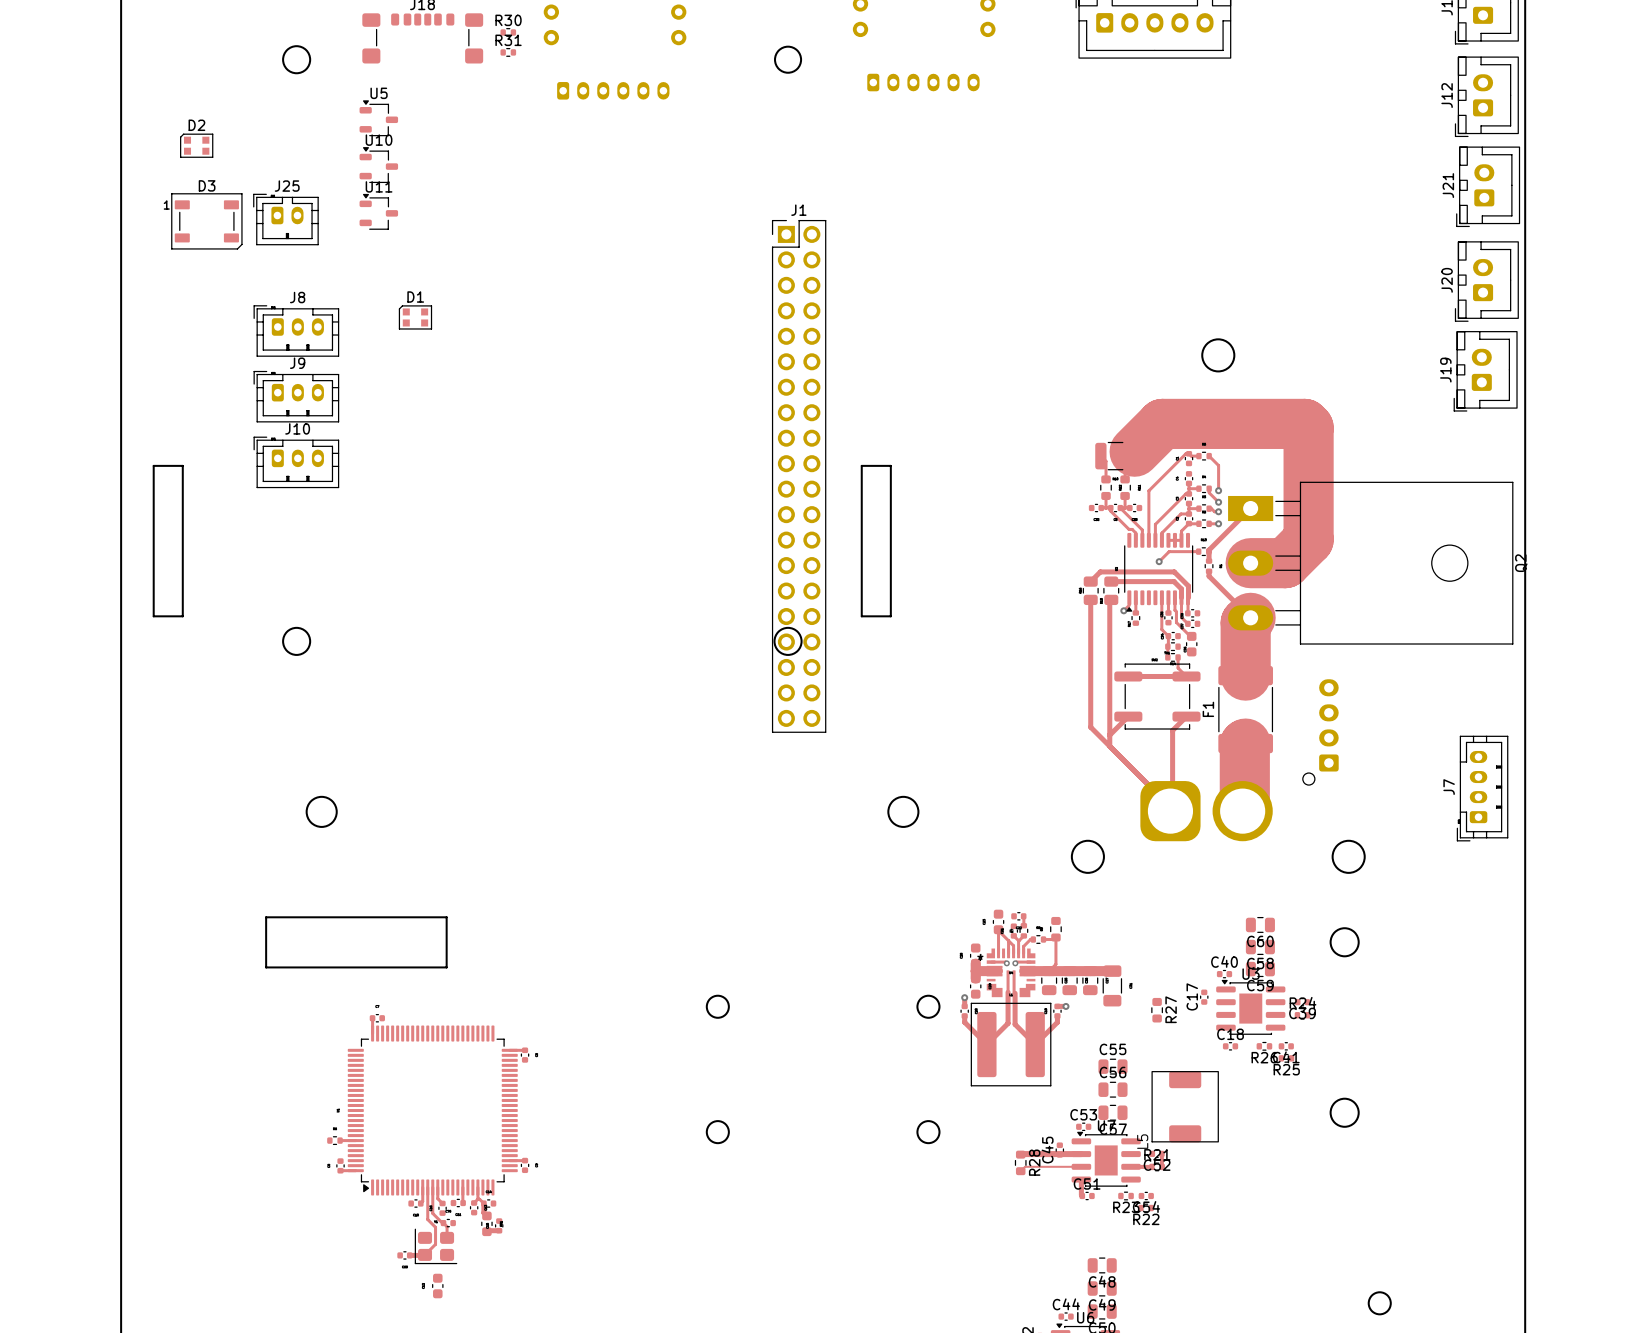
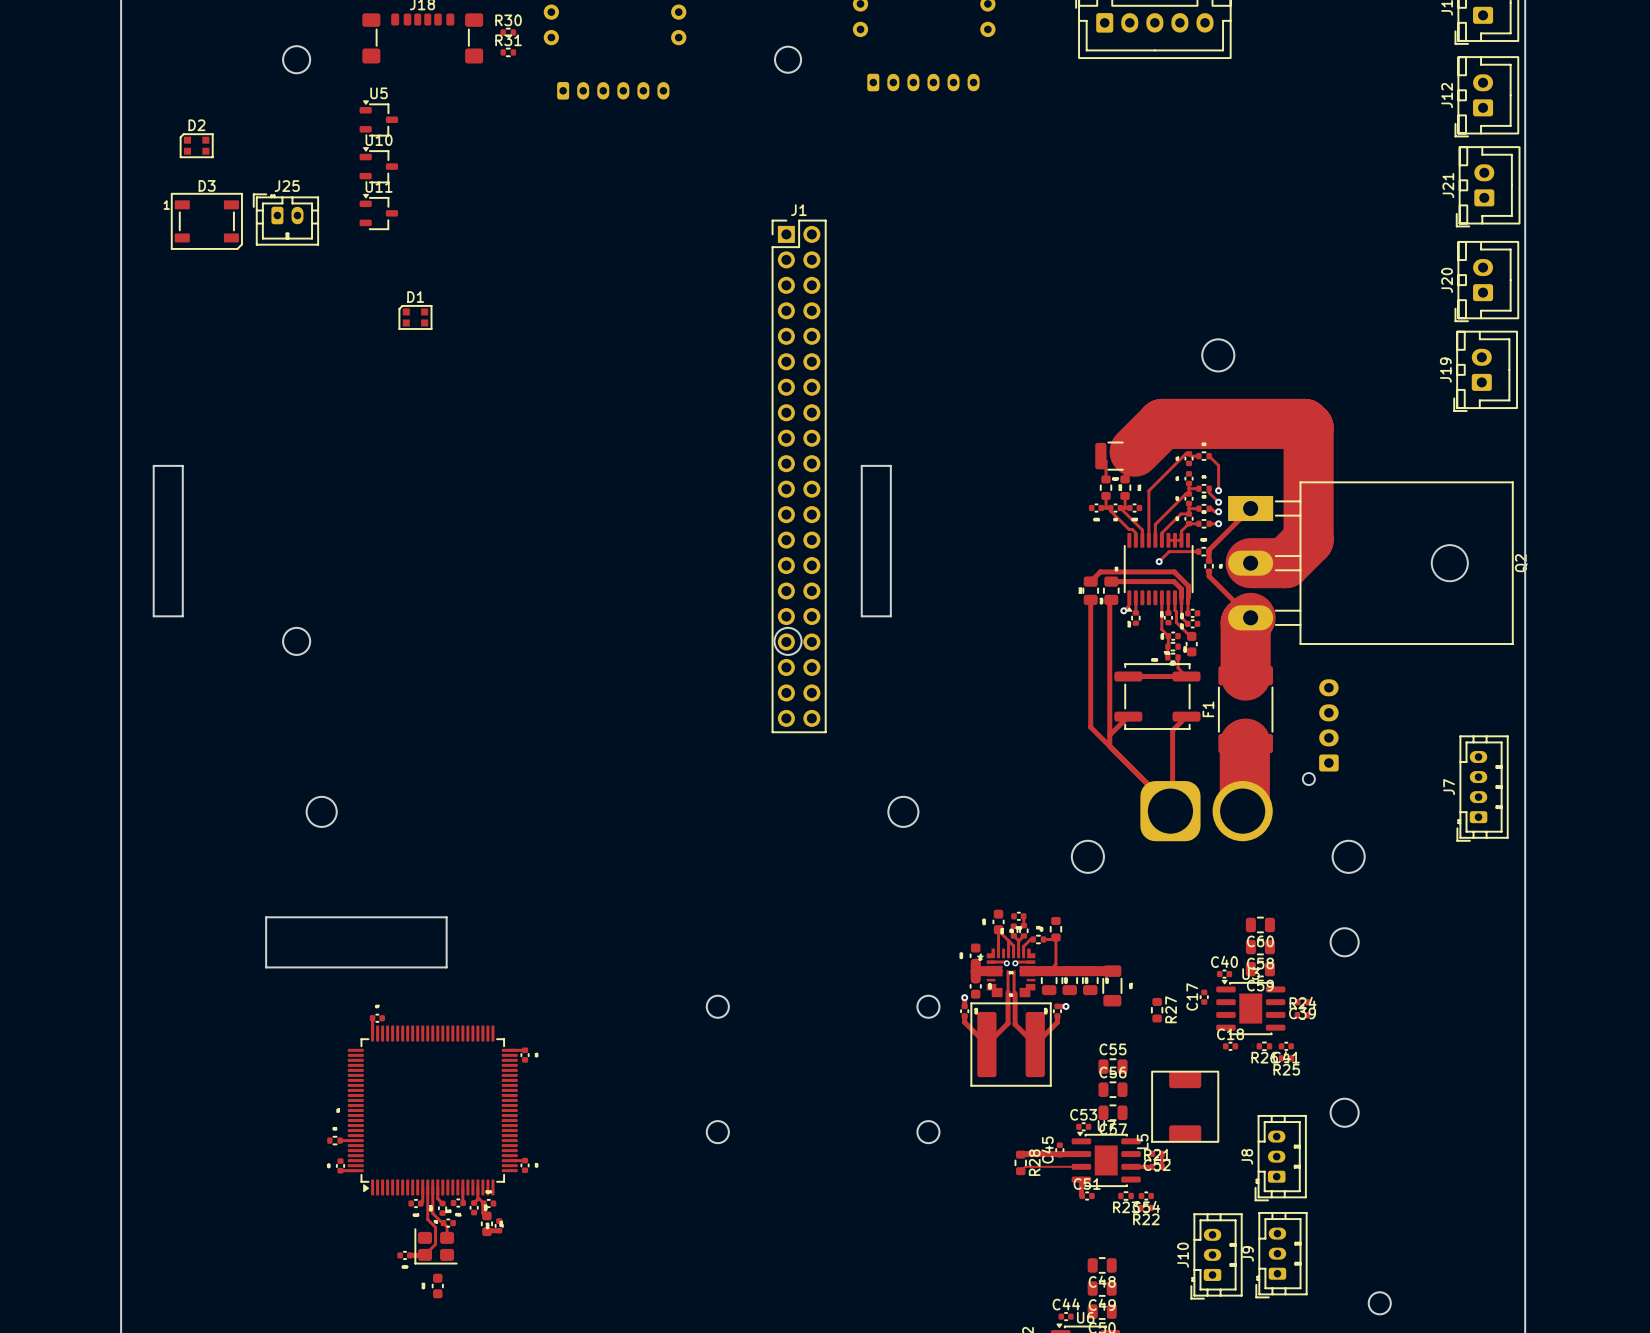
J8 rotation: 0° (296, 330) -> 90° counterclockwise (1280, 1158)
J8 position: (296, 330) -> (1280, 1158)
J9 rotation: 0° (296, 396) -> 90° counterclockwise (1281, 1255)
J9 position: (296, 396) -> (1281, 1255)
J10 rotation: 0° (296, 462) -> 90° counterclockwise (1216, 1256)
J10 position: (296, 462) -> (1216, 1256)

